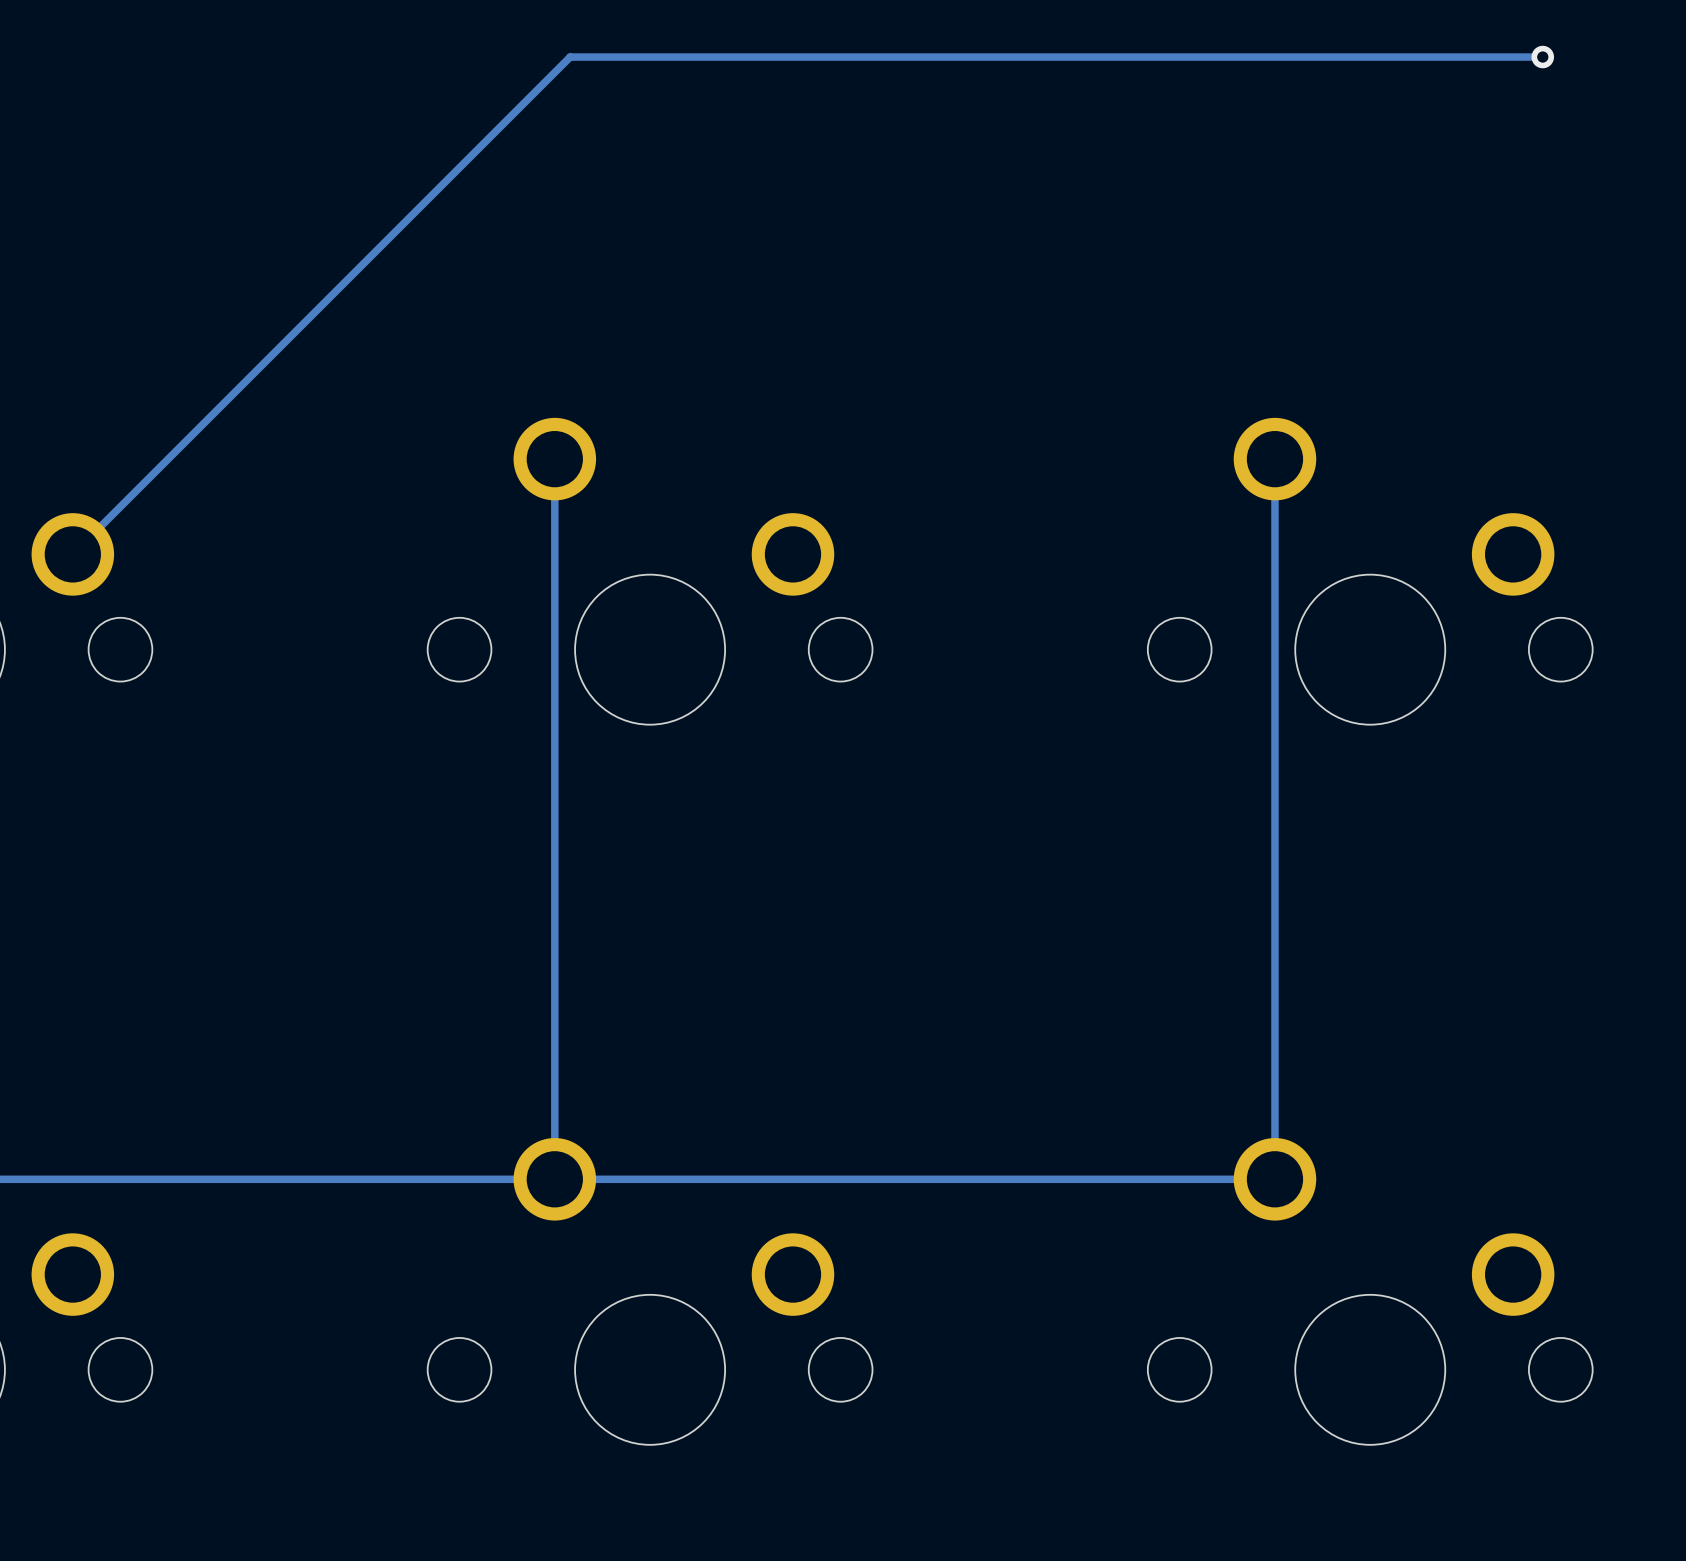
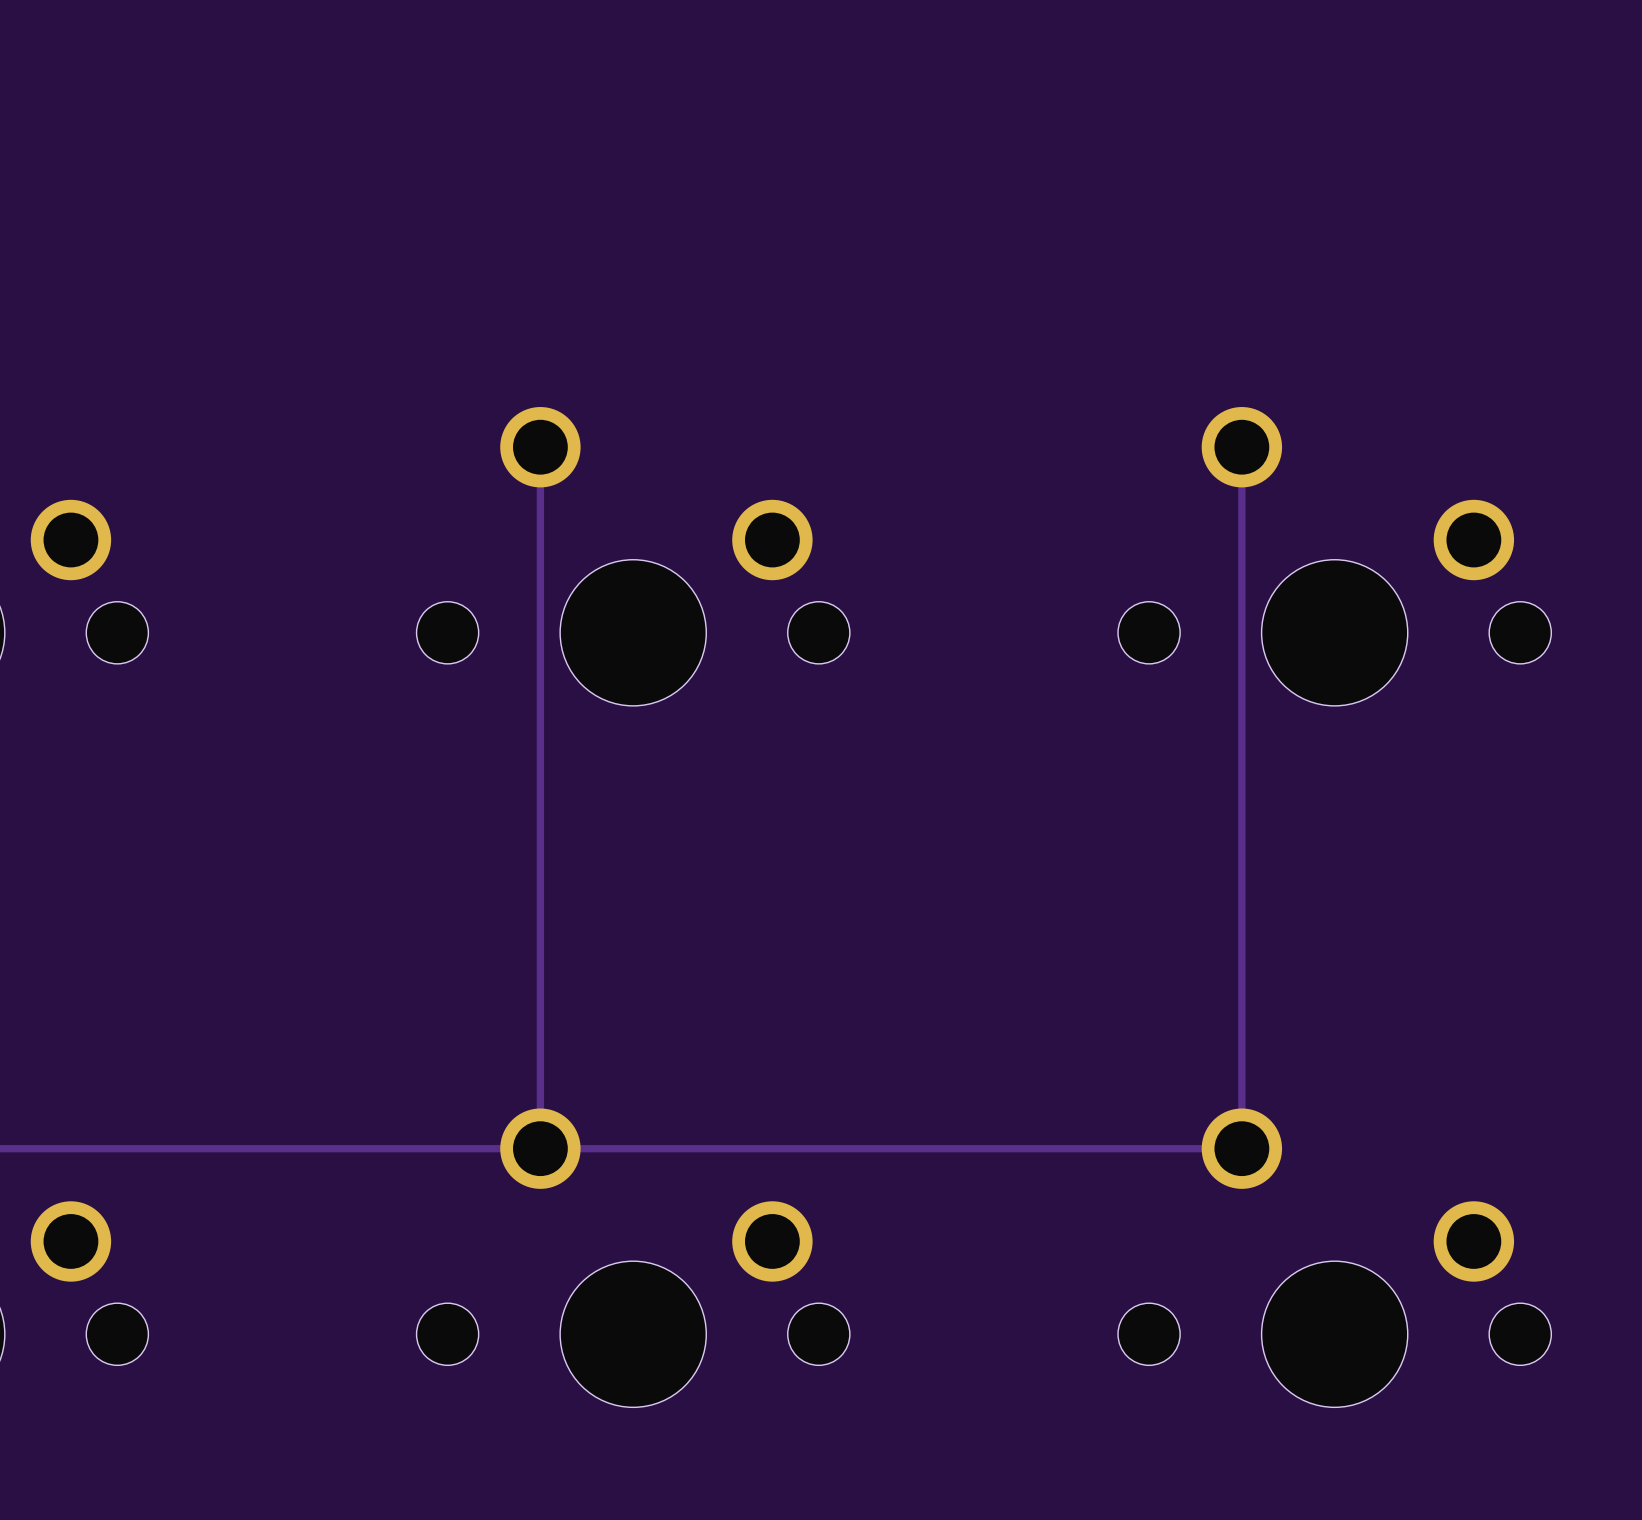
track: (1542, 57) (570, 57) (72, 554) -> none
via: (1542, 57) -> none

